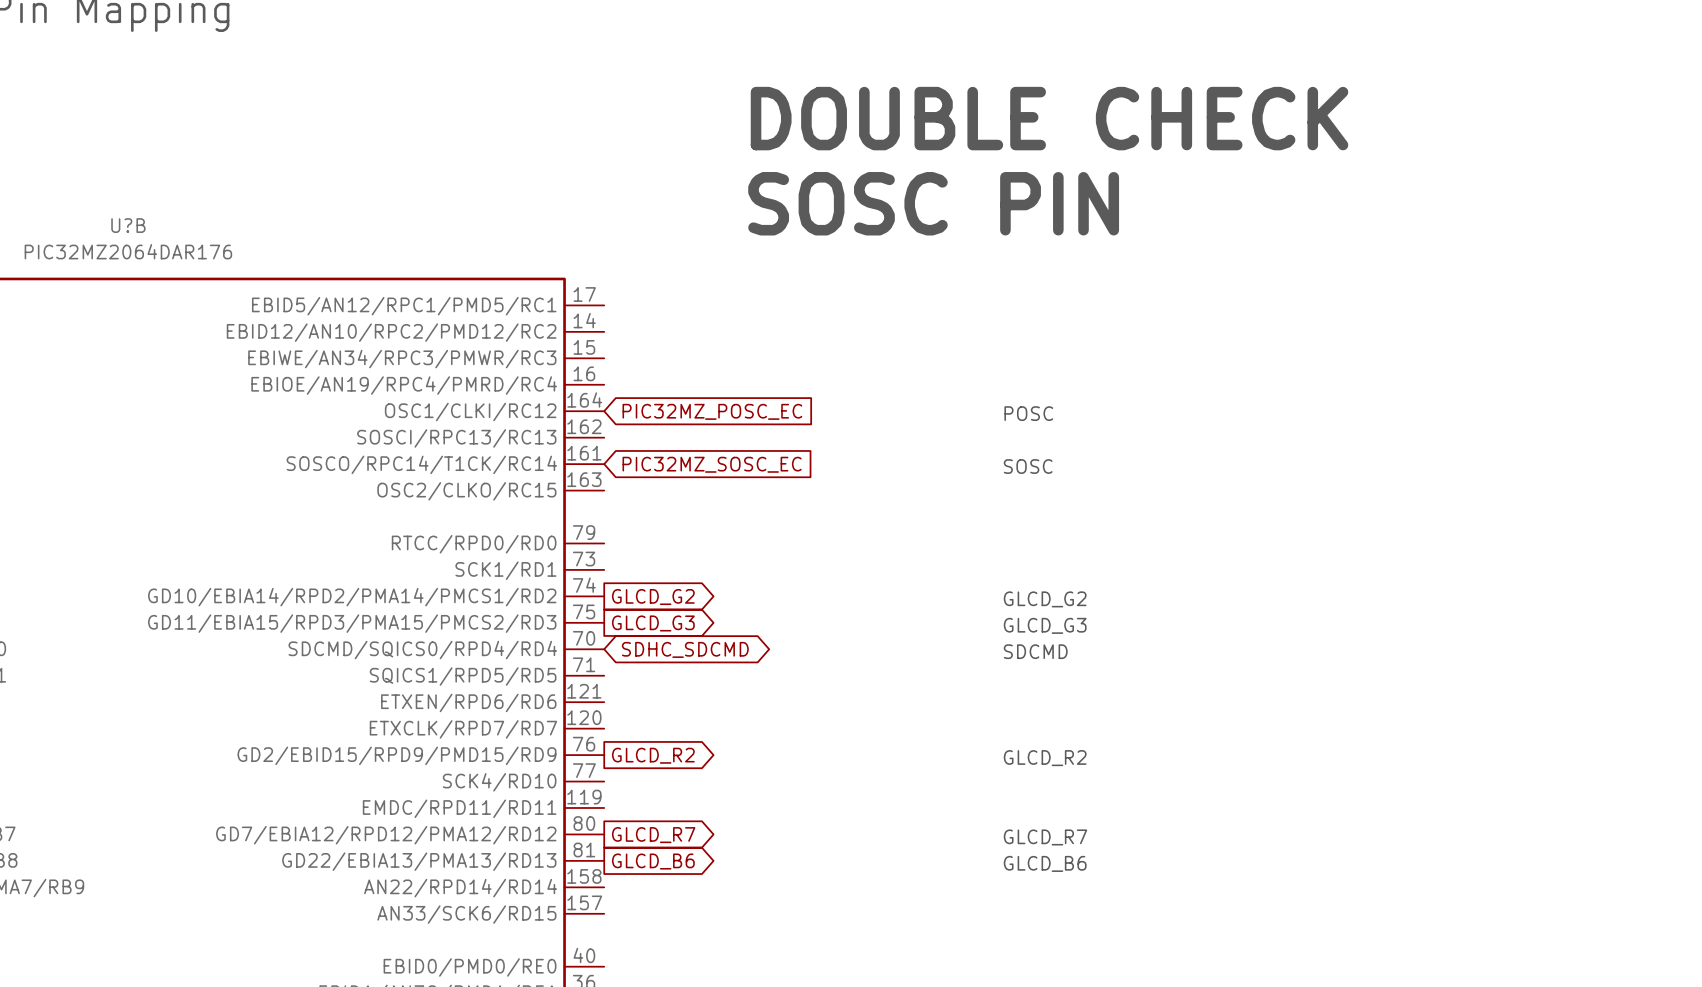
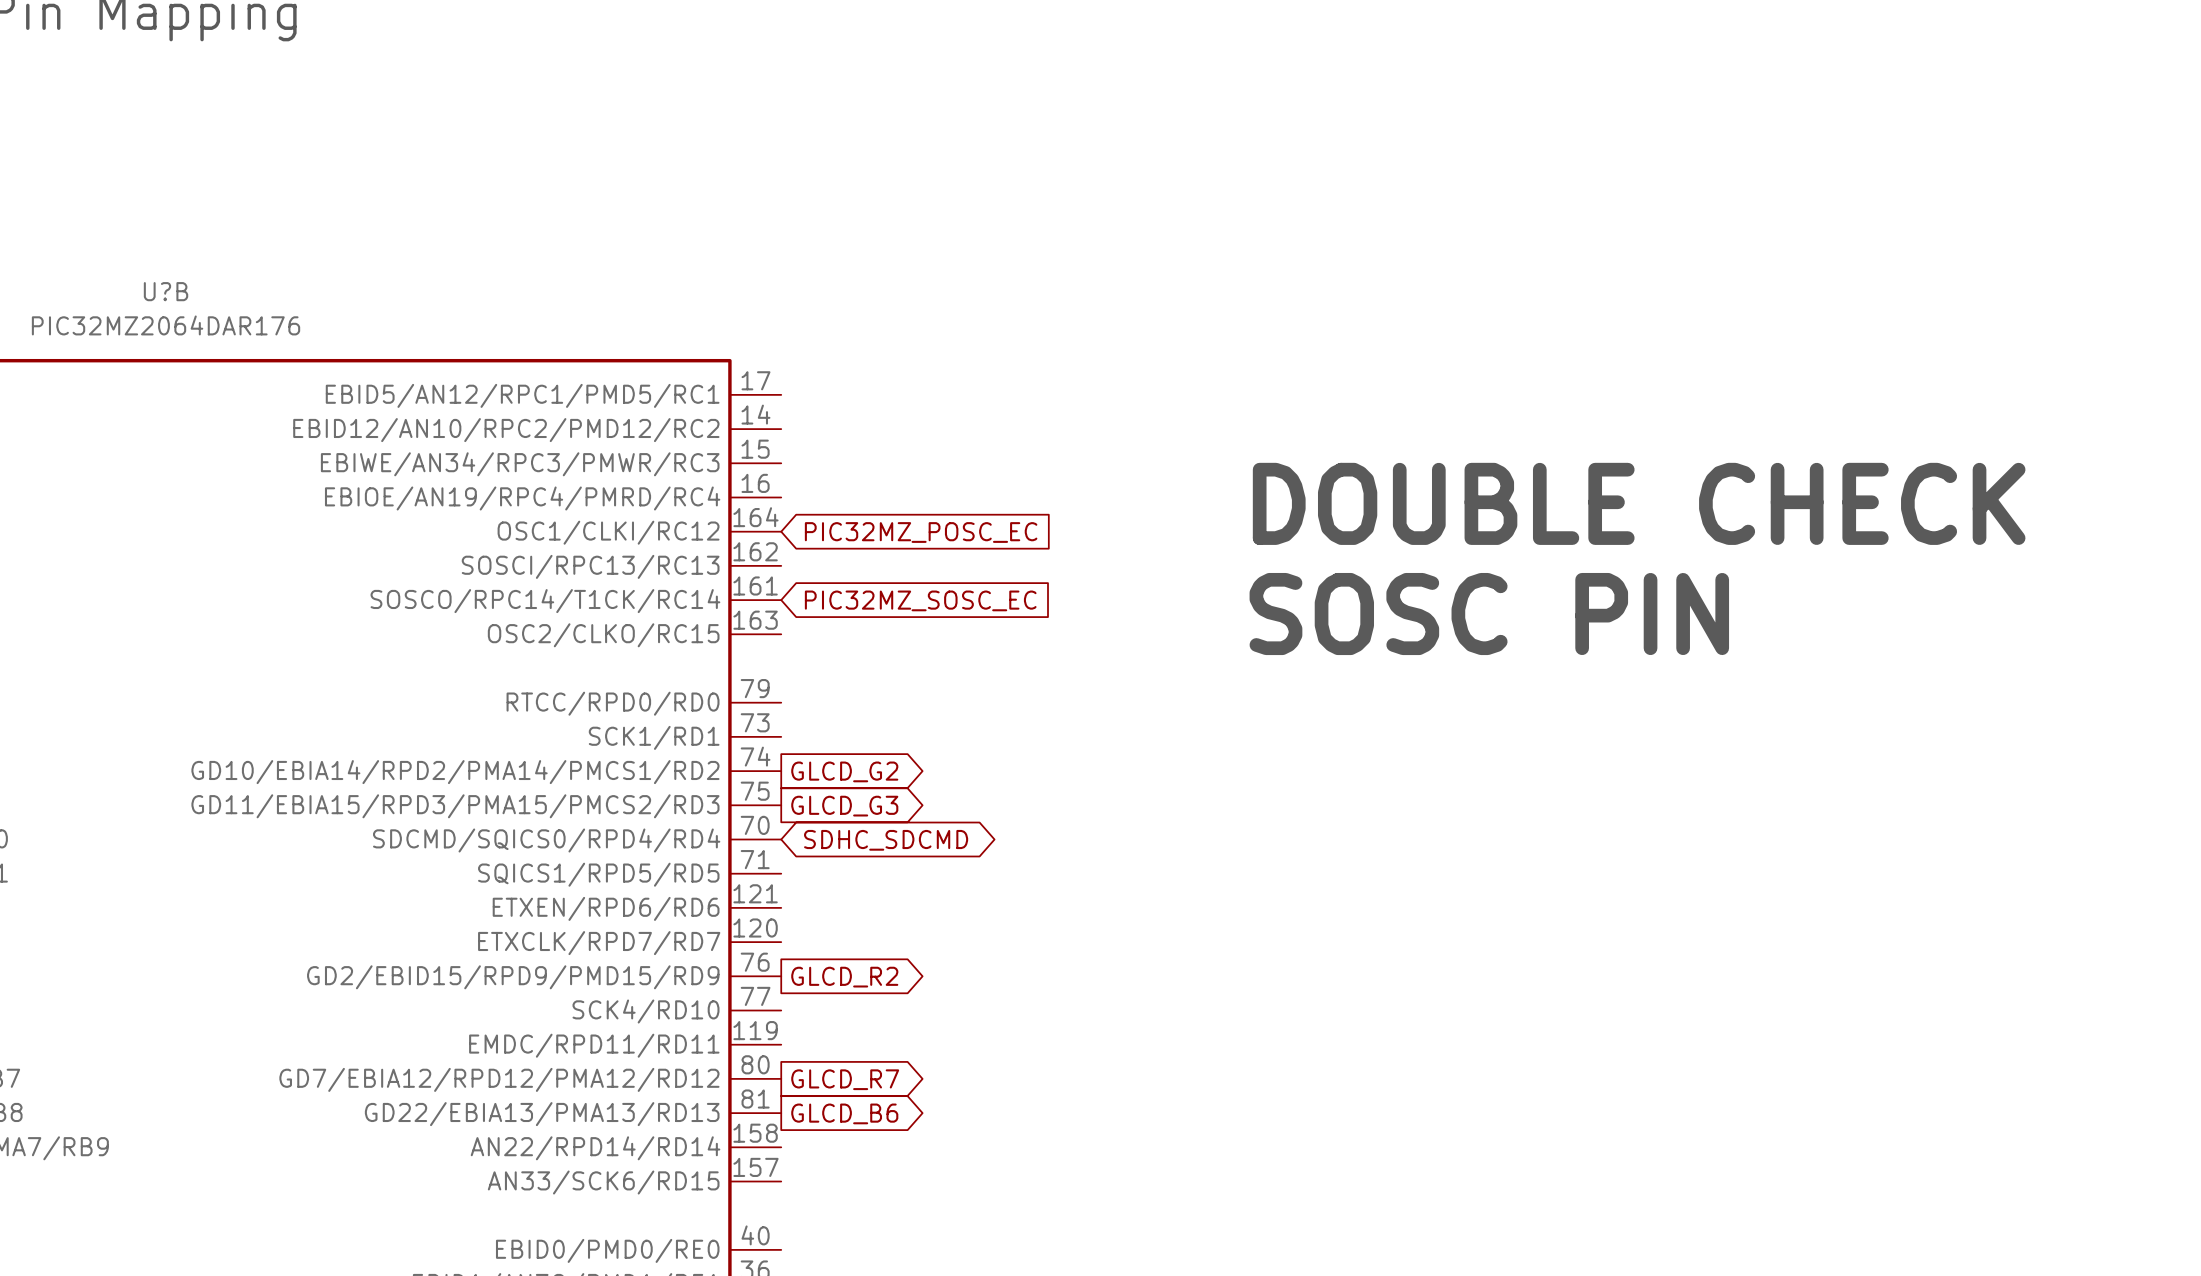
text: DOUBLE CHECK (1049, 118) -> none
text: SOSC PIN (933, 203) -> none
text: none -> DOUBLE CHECK (1639, 503)
text: POSC (1028, 413) -> none
text: SOSC (1028, 466) -> SOSC PIN (1489, 614)
text: GLCD_G2 (1045, 599) -> none
text: GLCD_G3 (1045, 625) -> none
text: SDCMD (1035, 651) -> none
text: GLCD_R2 (1045, 758) -> none
text: GLCD_R7 (1045, 837) -> none
text: GLCD_B6 (1045, 863) -> none

